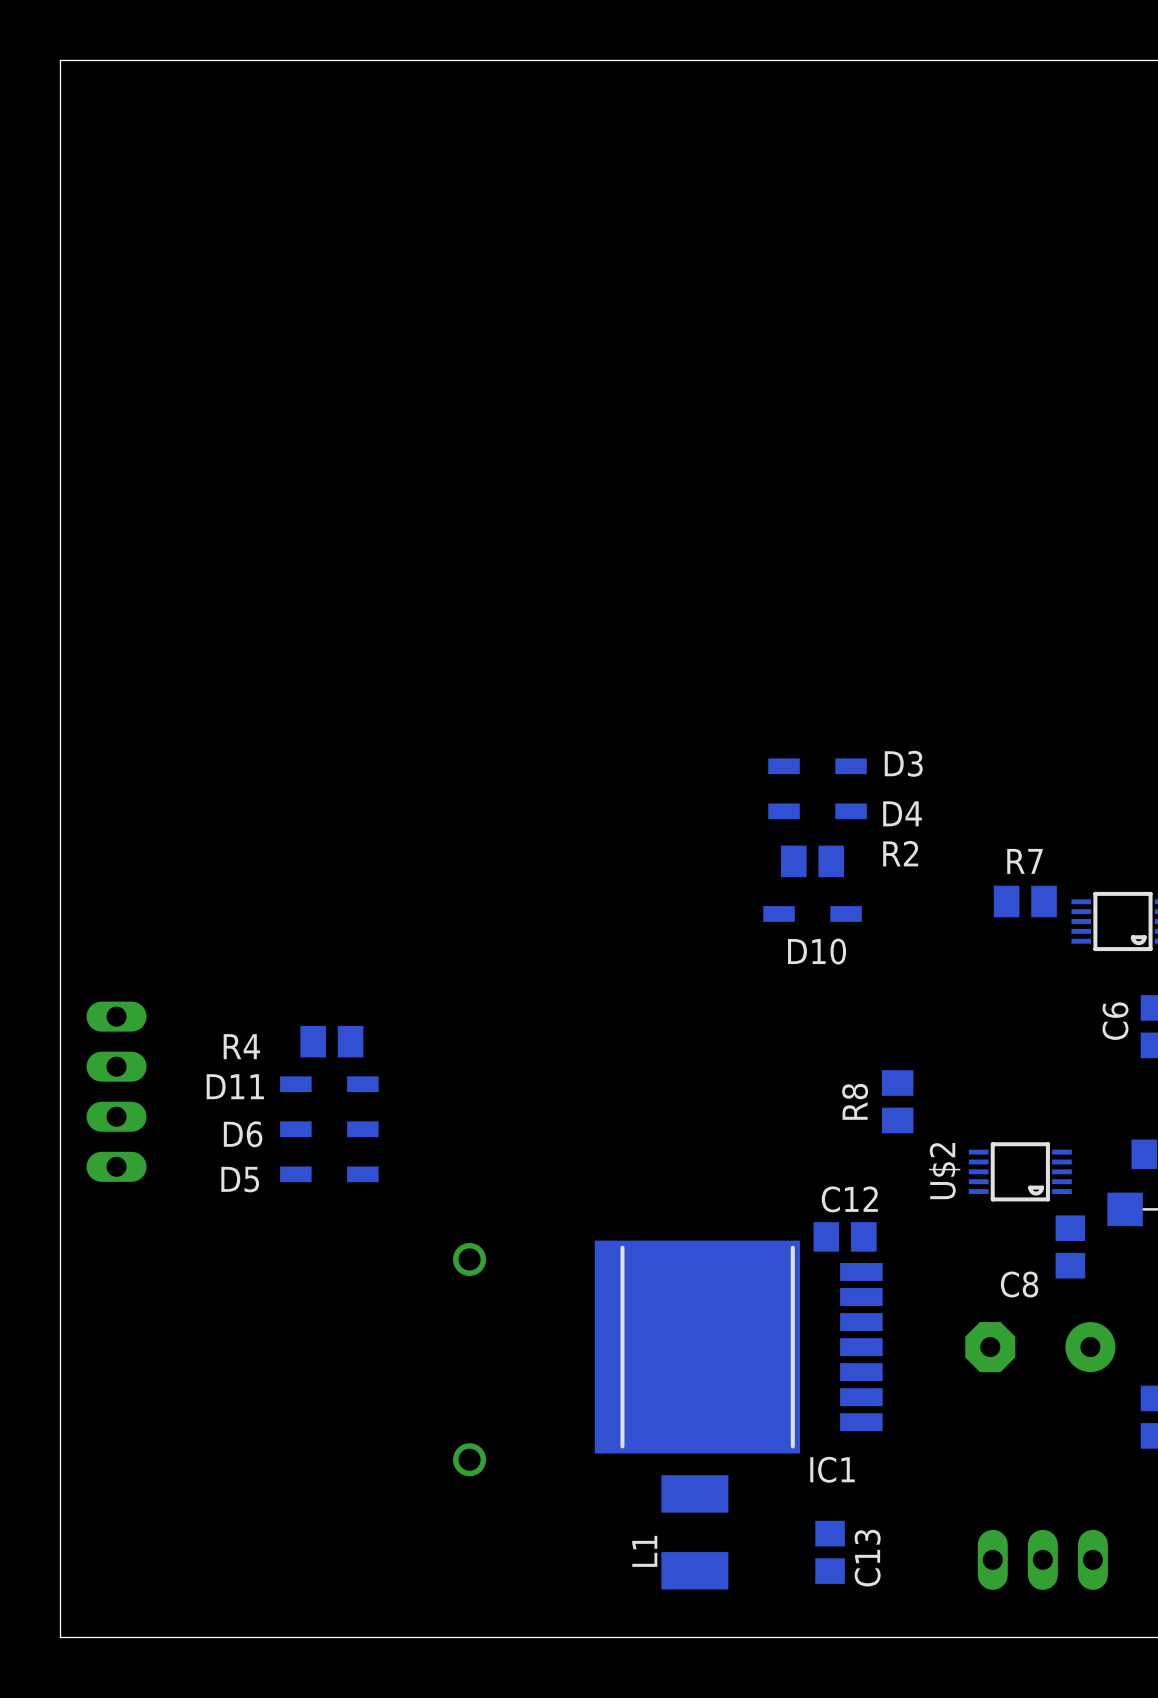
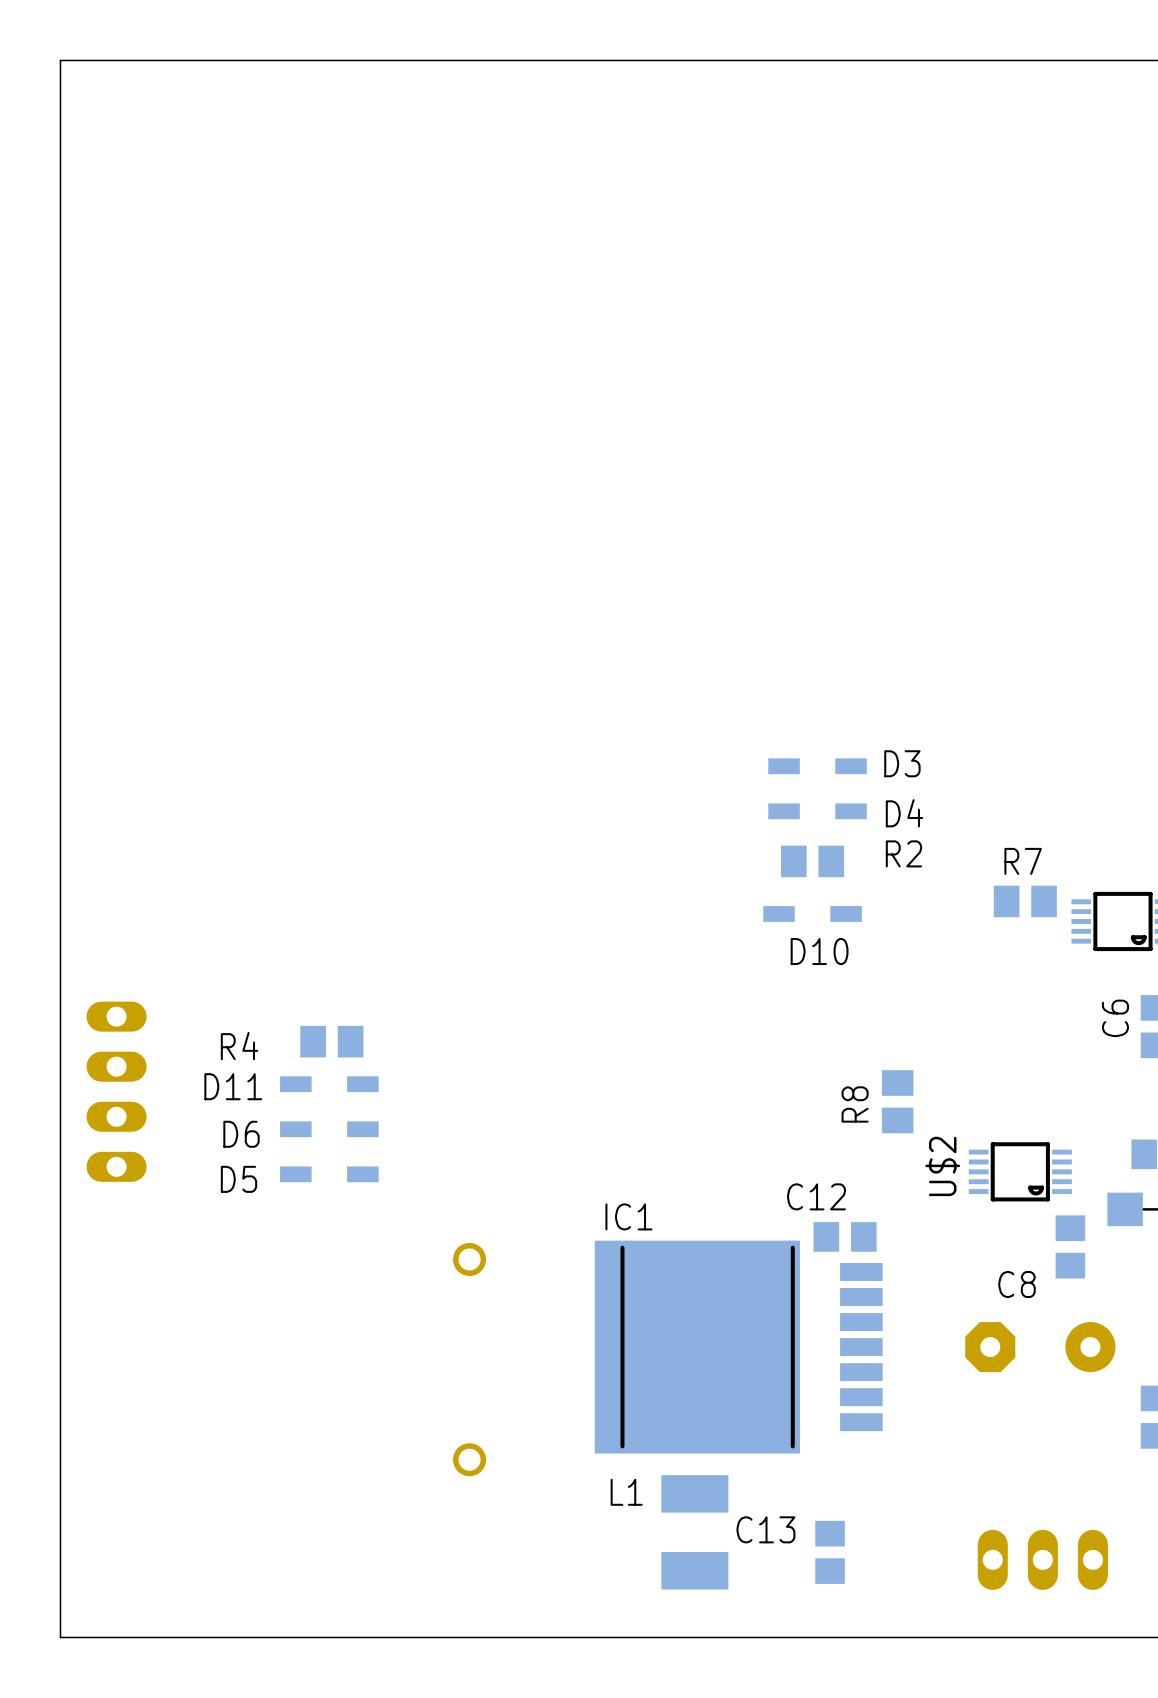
C12 name position: C12 (849, 1199) -> C12 (816, 1196)
IC1 name position: IC1 (832, 1469) -> IC1 (628, 1216)
L1 name rotation: 0° (644, 1551) -> 90° clockwise (626, 1492)
L1 name position: L1 (644, 1551) -> L1 (626, 1492)
C13 name rotation: 0° (867, 1558) -> 90° clockwise (765, 1529)
C13 name position: C13 (867, 1558) -> C13 (765, 1529)

